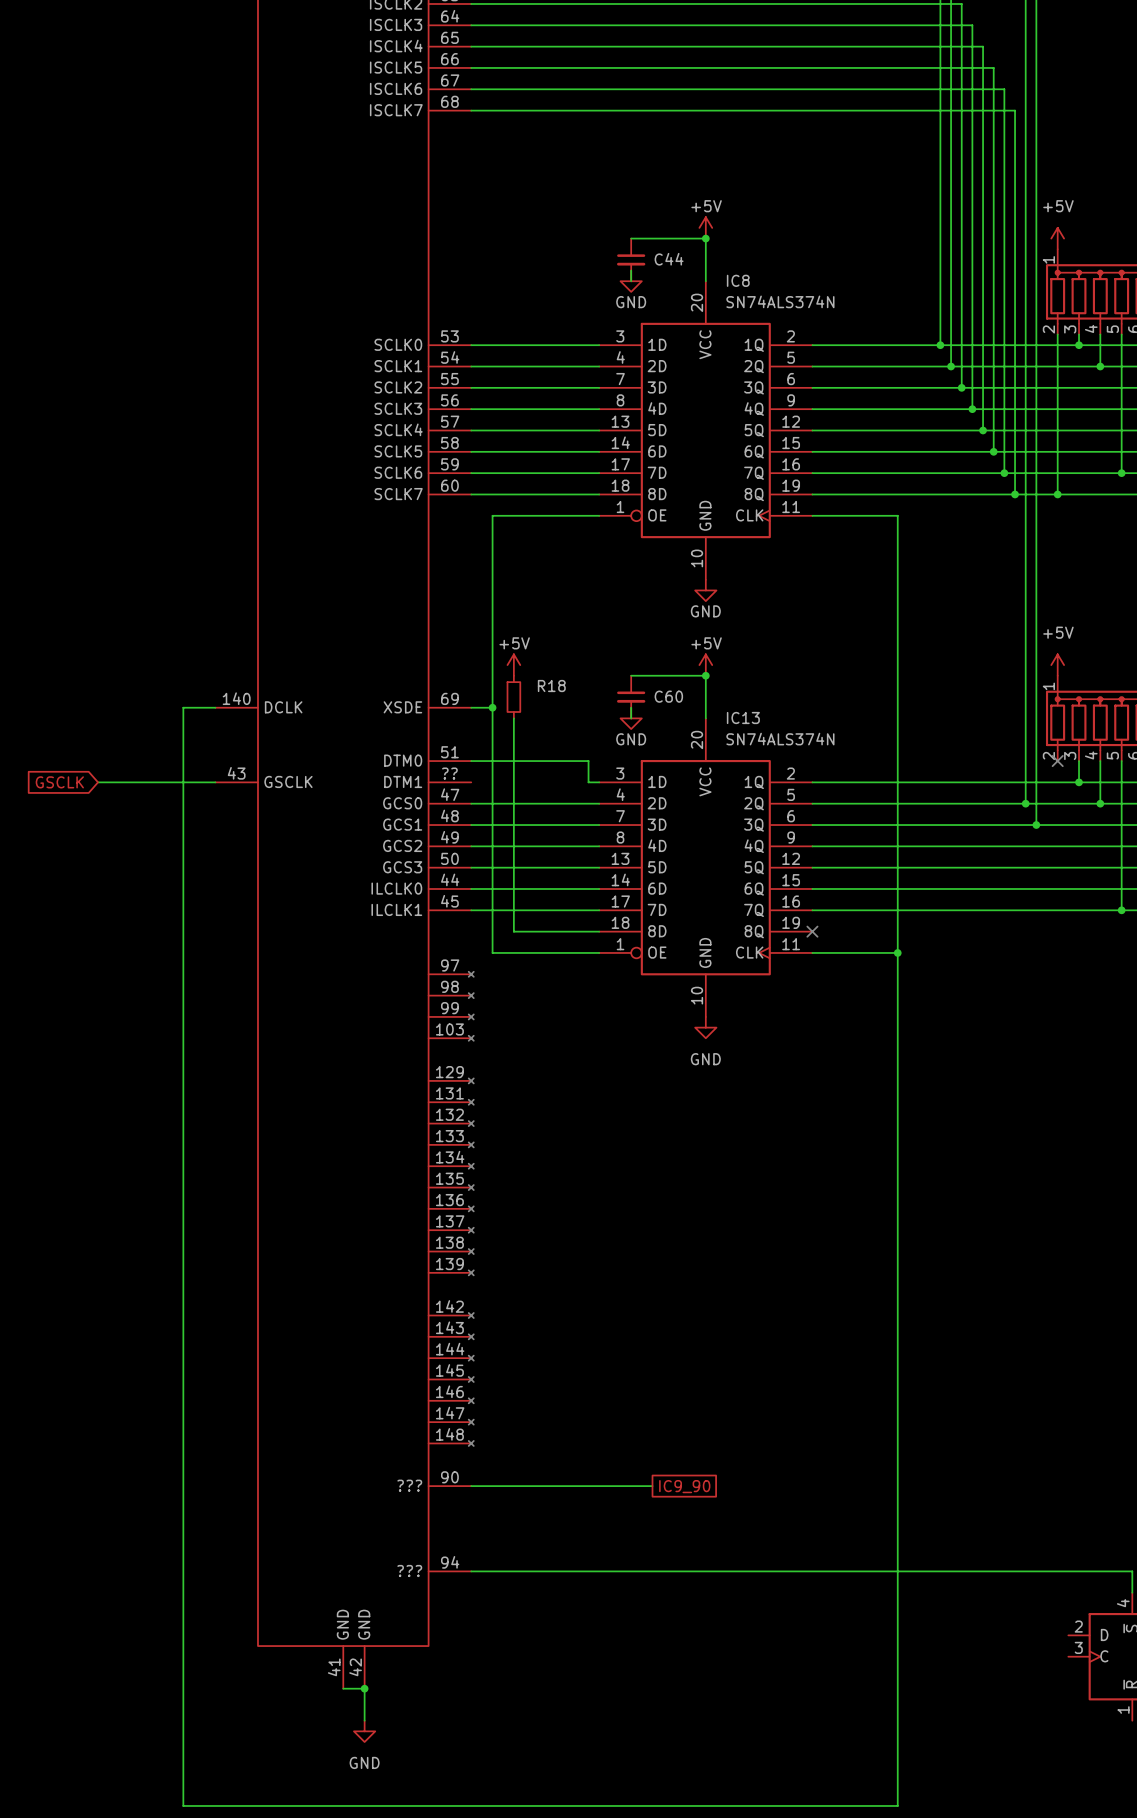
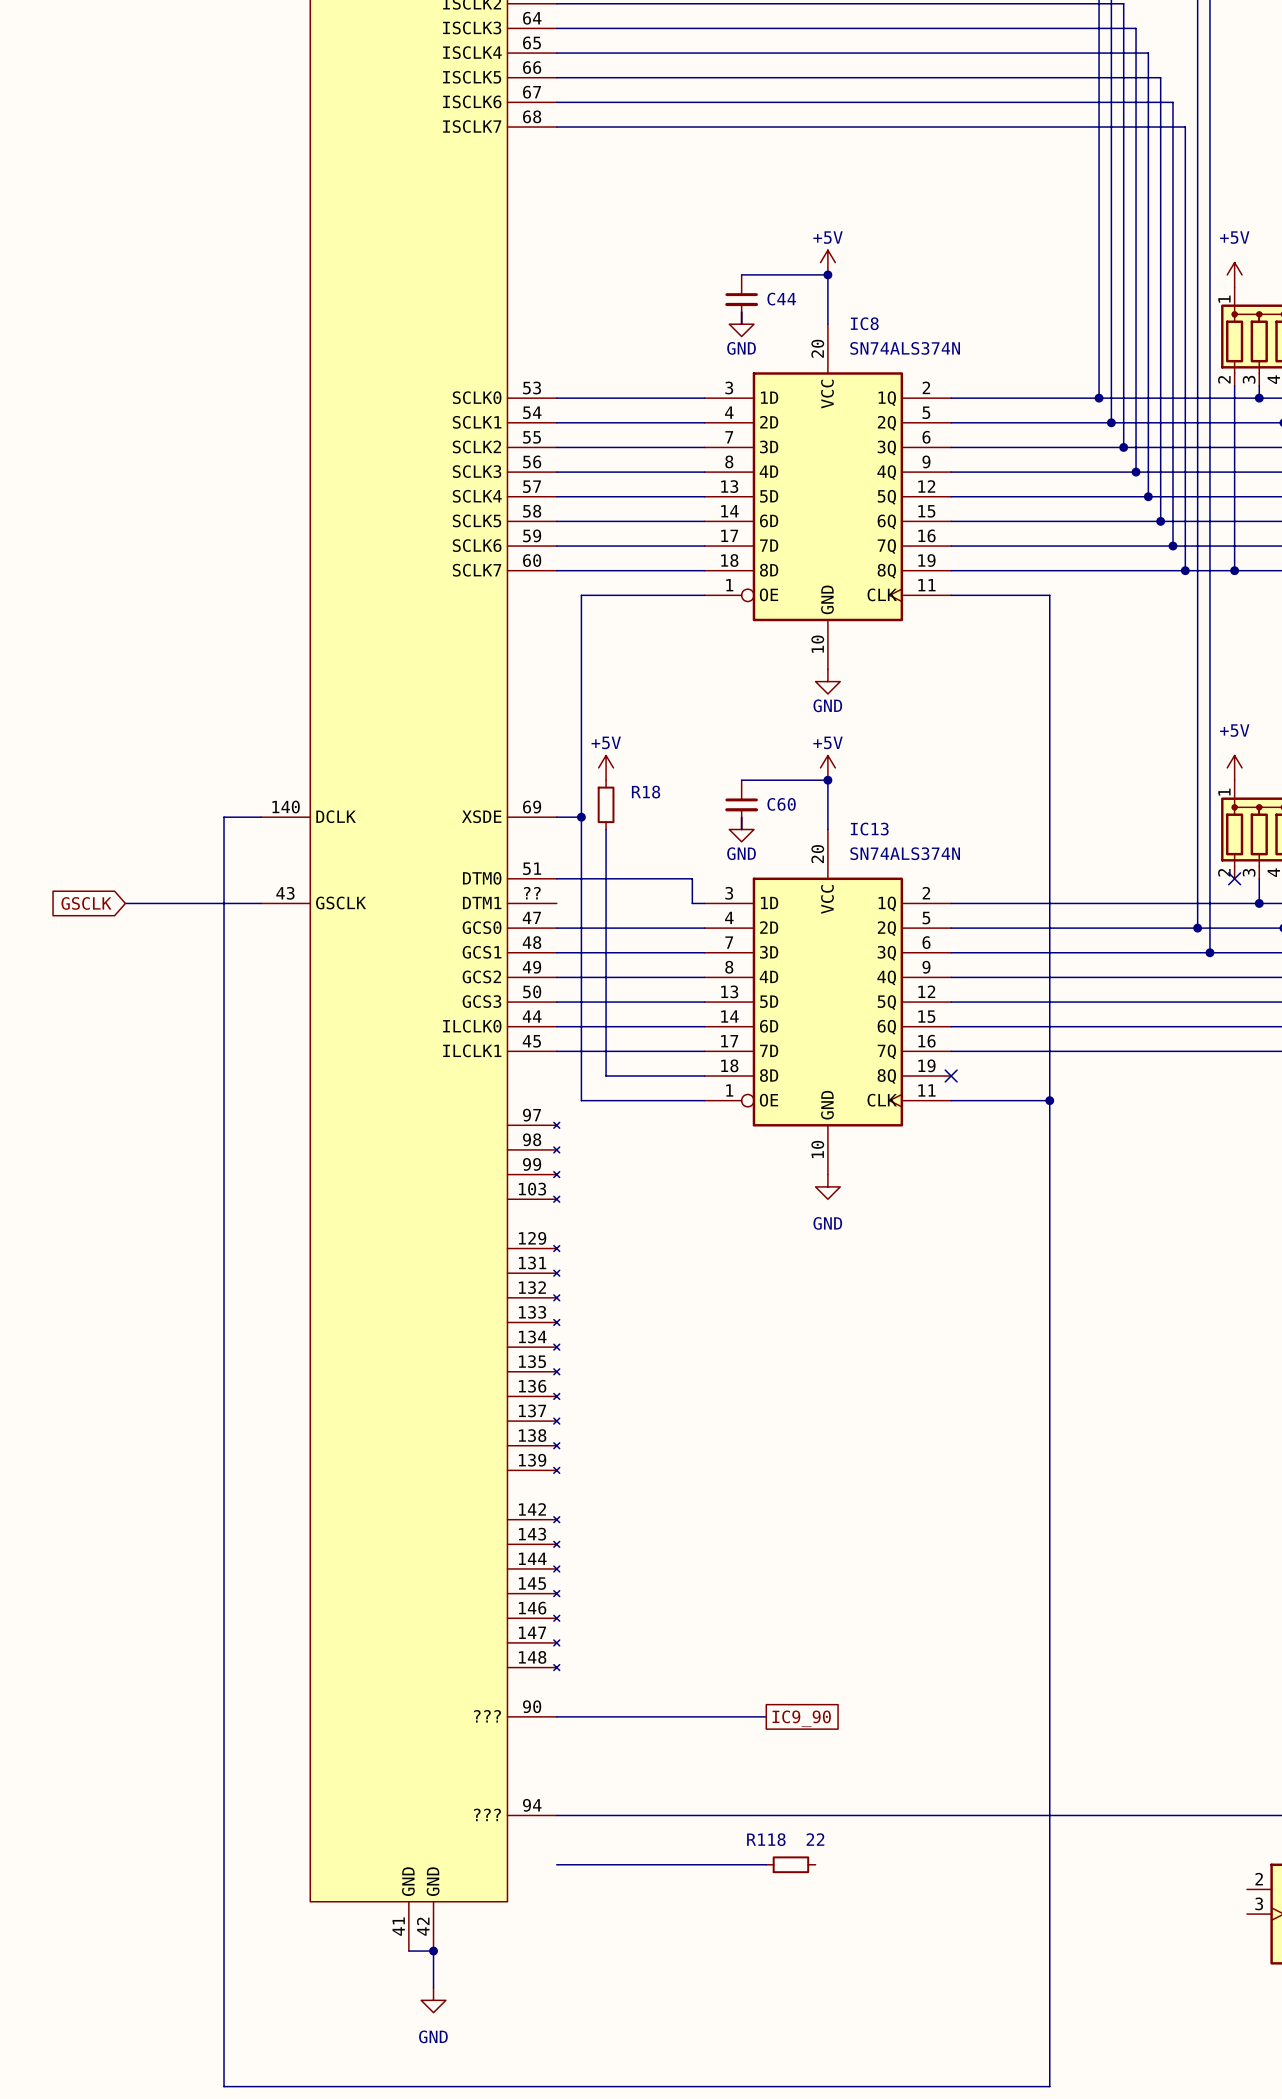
wire: none -> (556, 1864) (766, 1864)
R118: none -> 22 (790, 1864)

